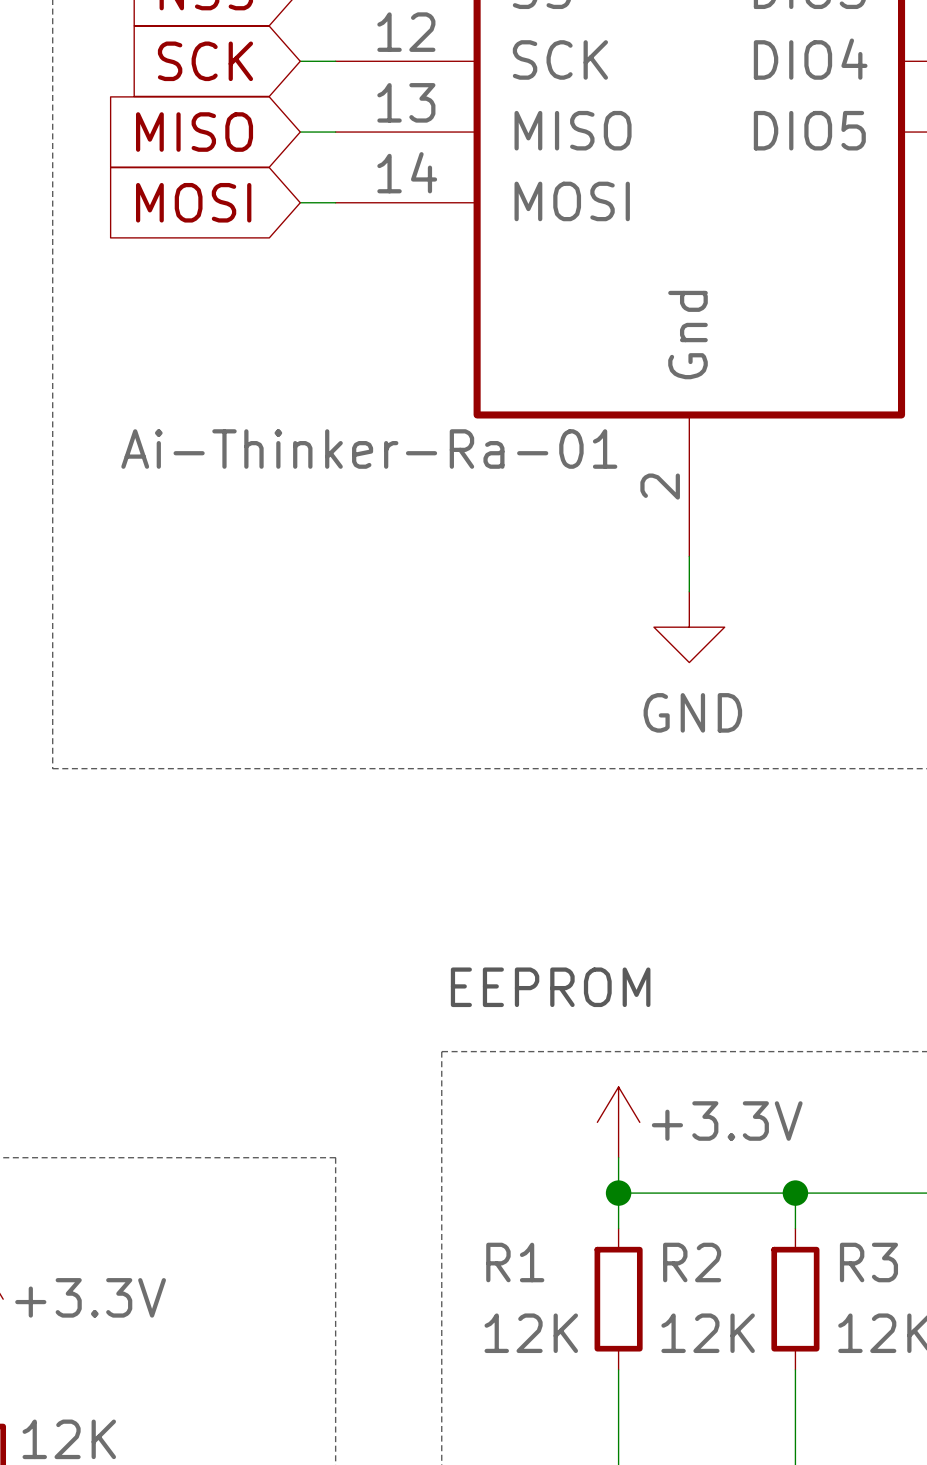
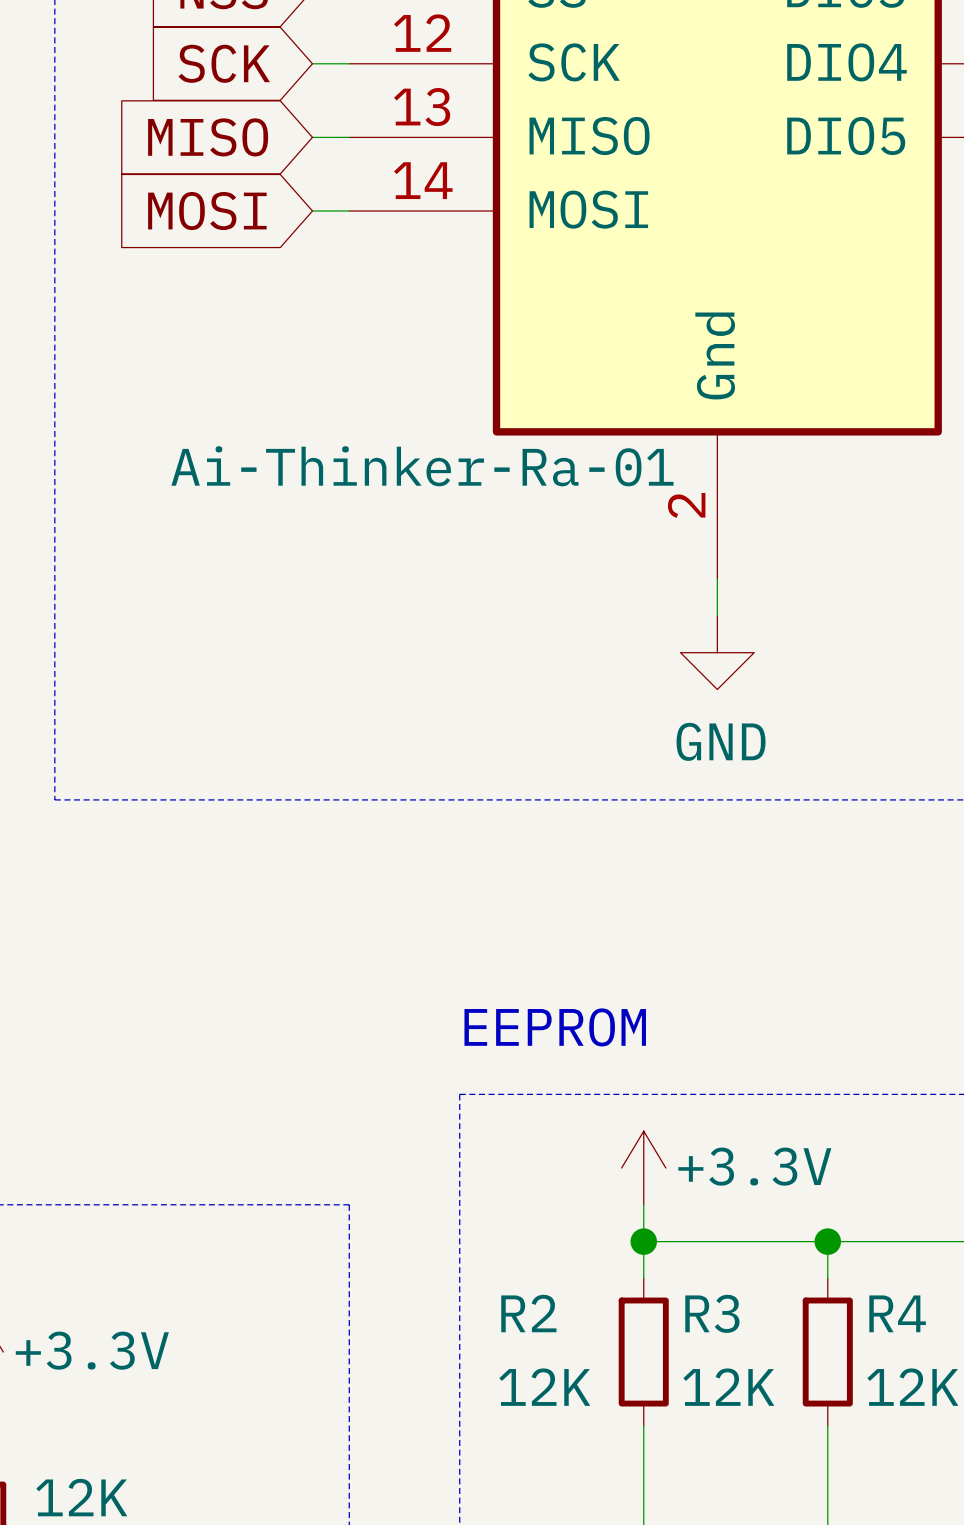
part value position: Ai-Thinker-Ra-01 (369, 449) -> Ai-Thinker-Ra-01 (422, 466)
R1 name: R1 (515, 1262) -> R2 (528, 1313)
R2 name: R2 (692, 1262) -> R3 (712, 1313)
R3 name: R3 (868, 1262) -> R4 (897, 1313)

